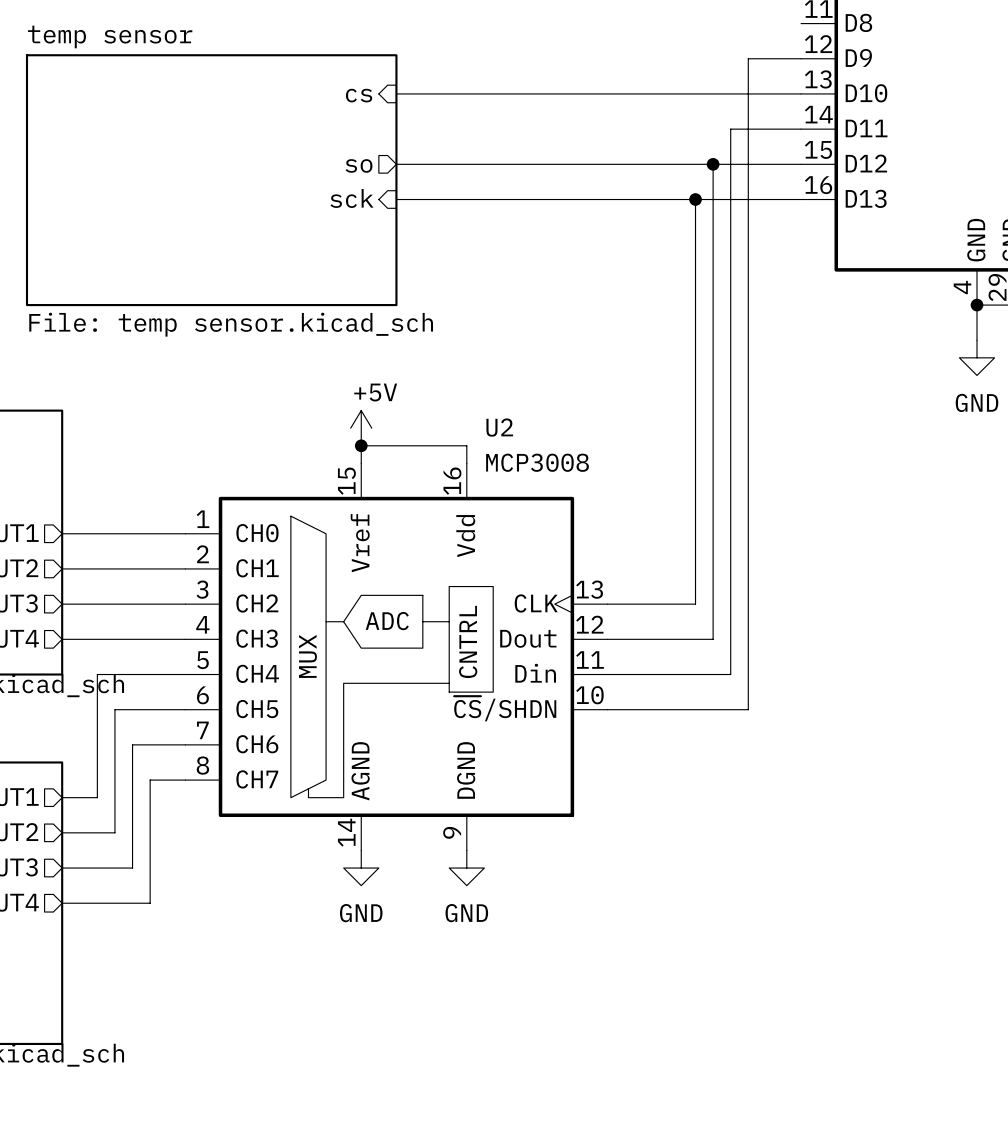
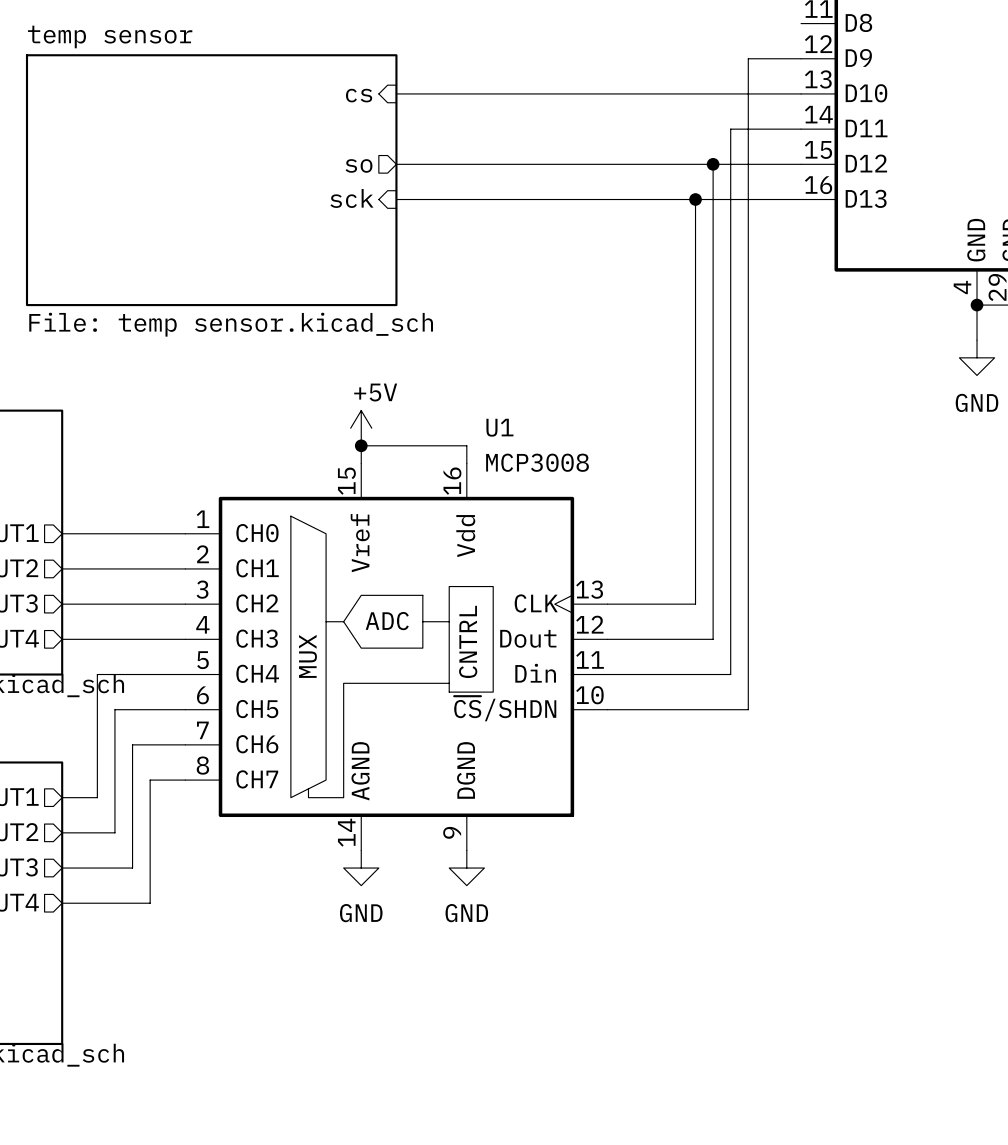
U2 name: U2 (499, 427) -> U1 (499, 427)

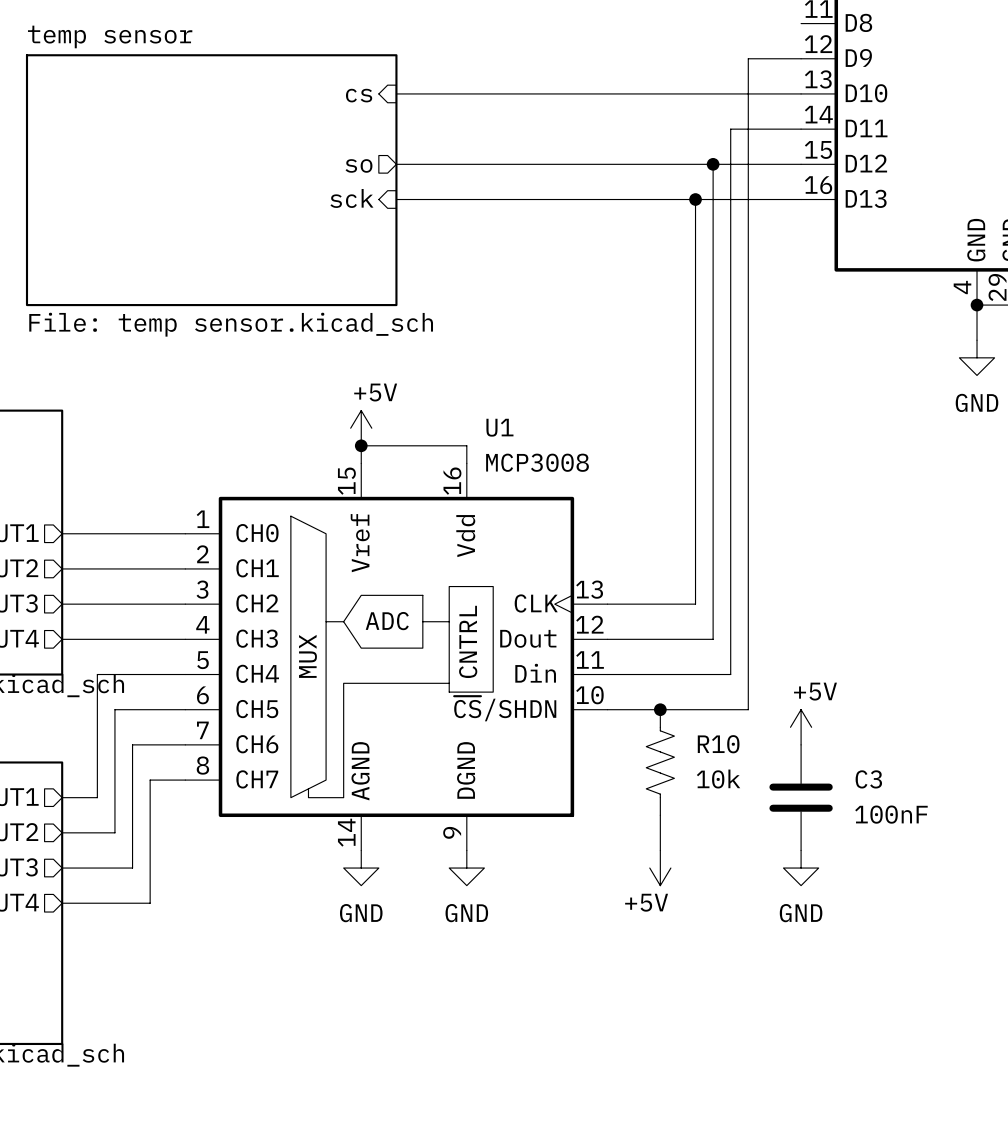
junction: none -> (660, 709)
power symbol: none -> +5V (801, 727)
R10: none -> 10k (660, 762)
C3: none -> 100nF (801, 797)
wire: none -> (660, 815) (660, 850)
power symbol: none -> +5V (660, 868)
power symbol: none -> GND (801, 868)

